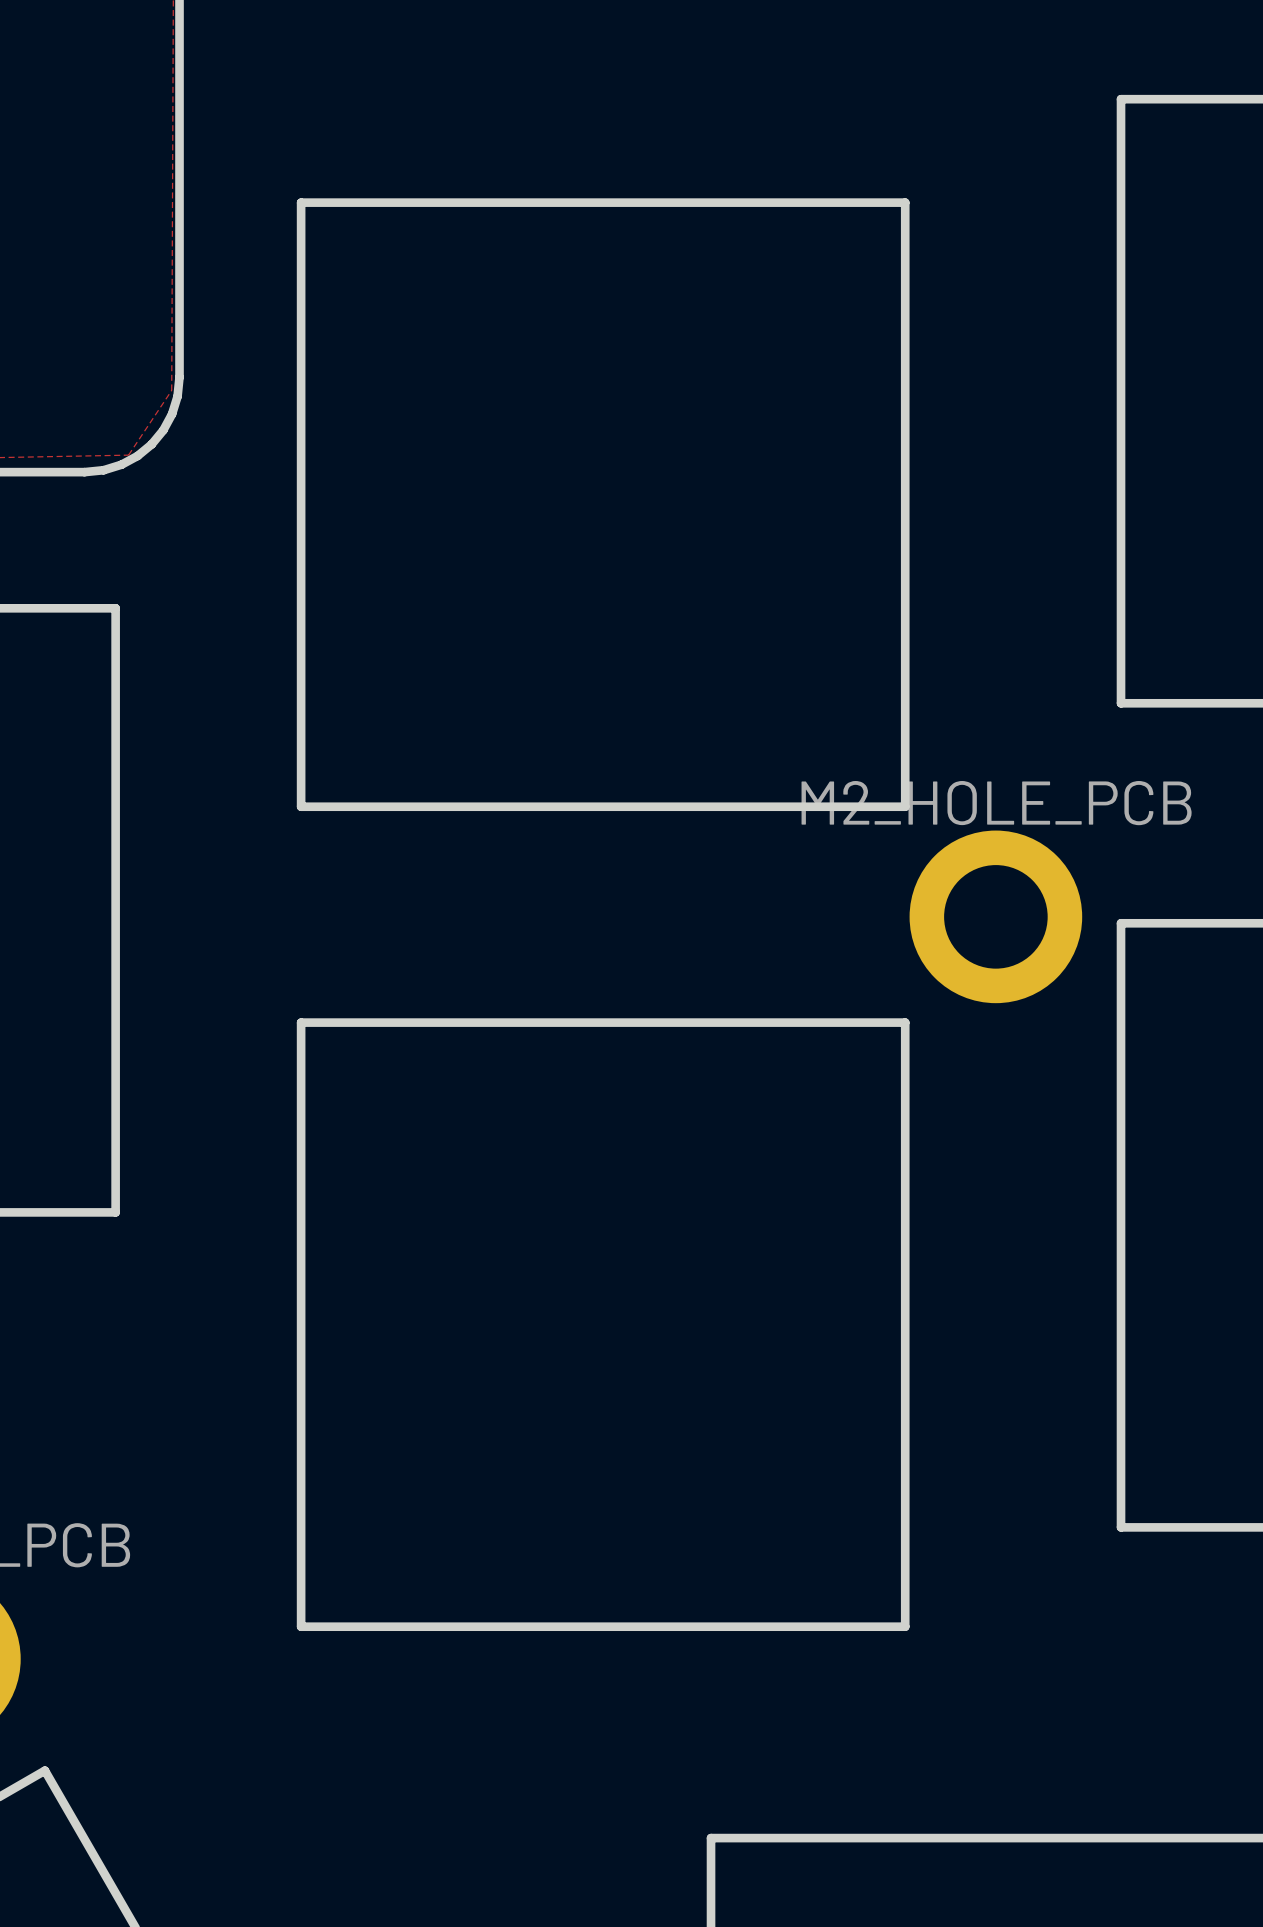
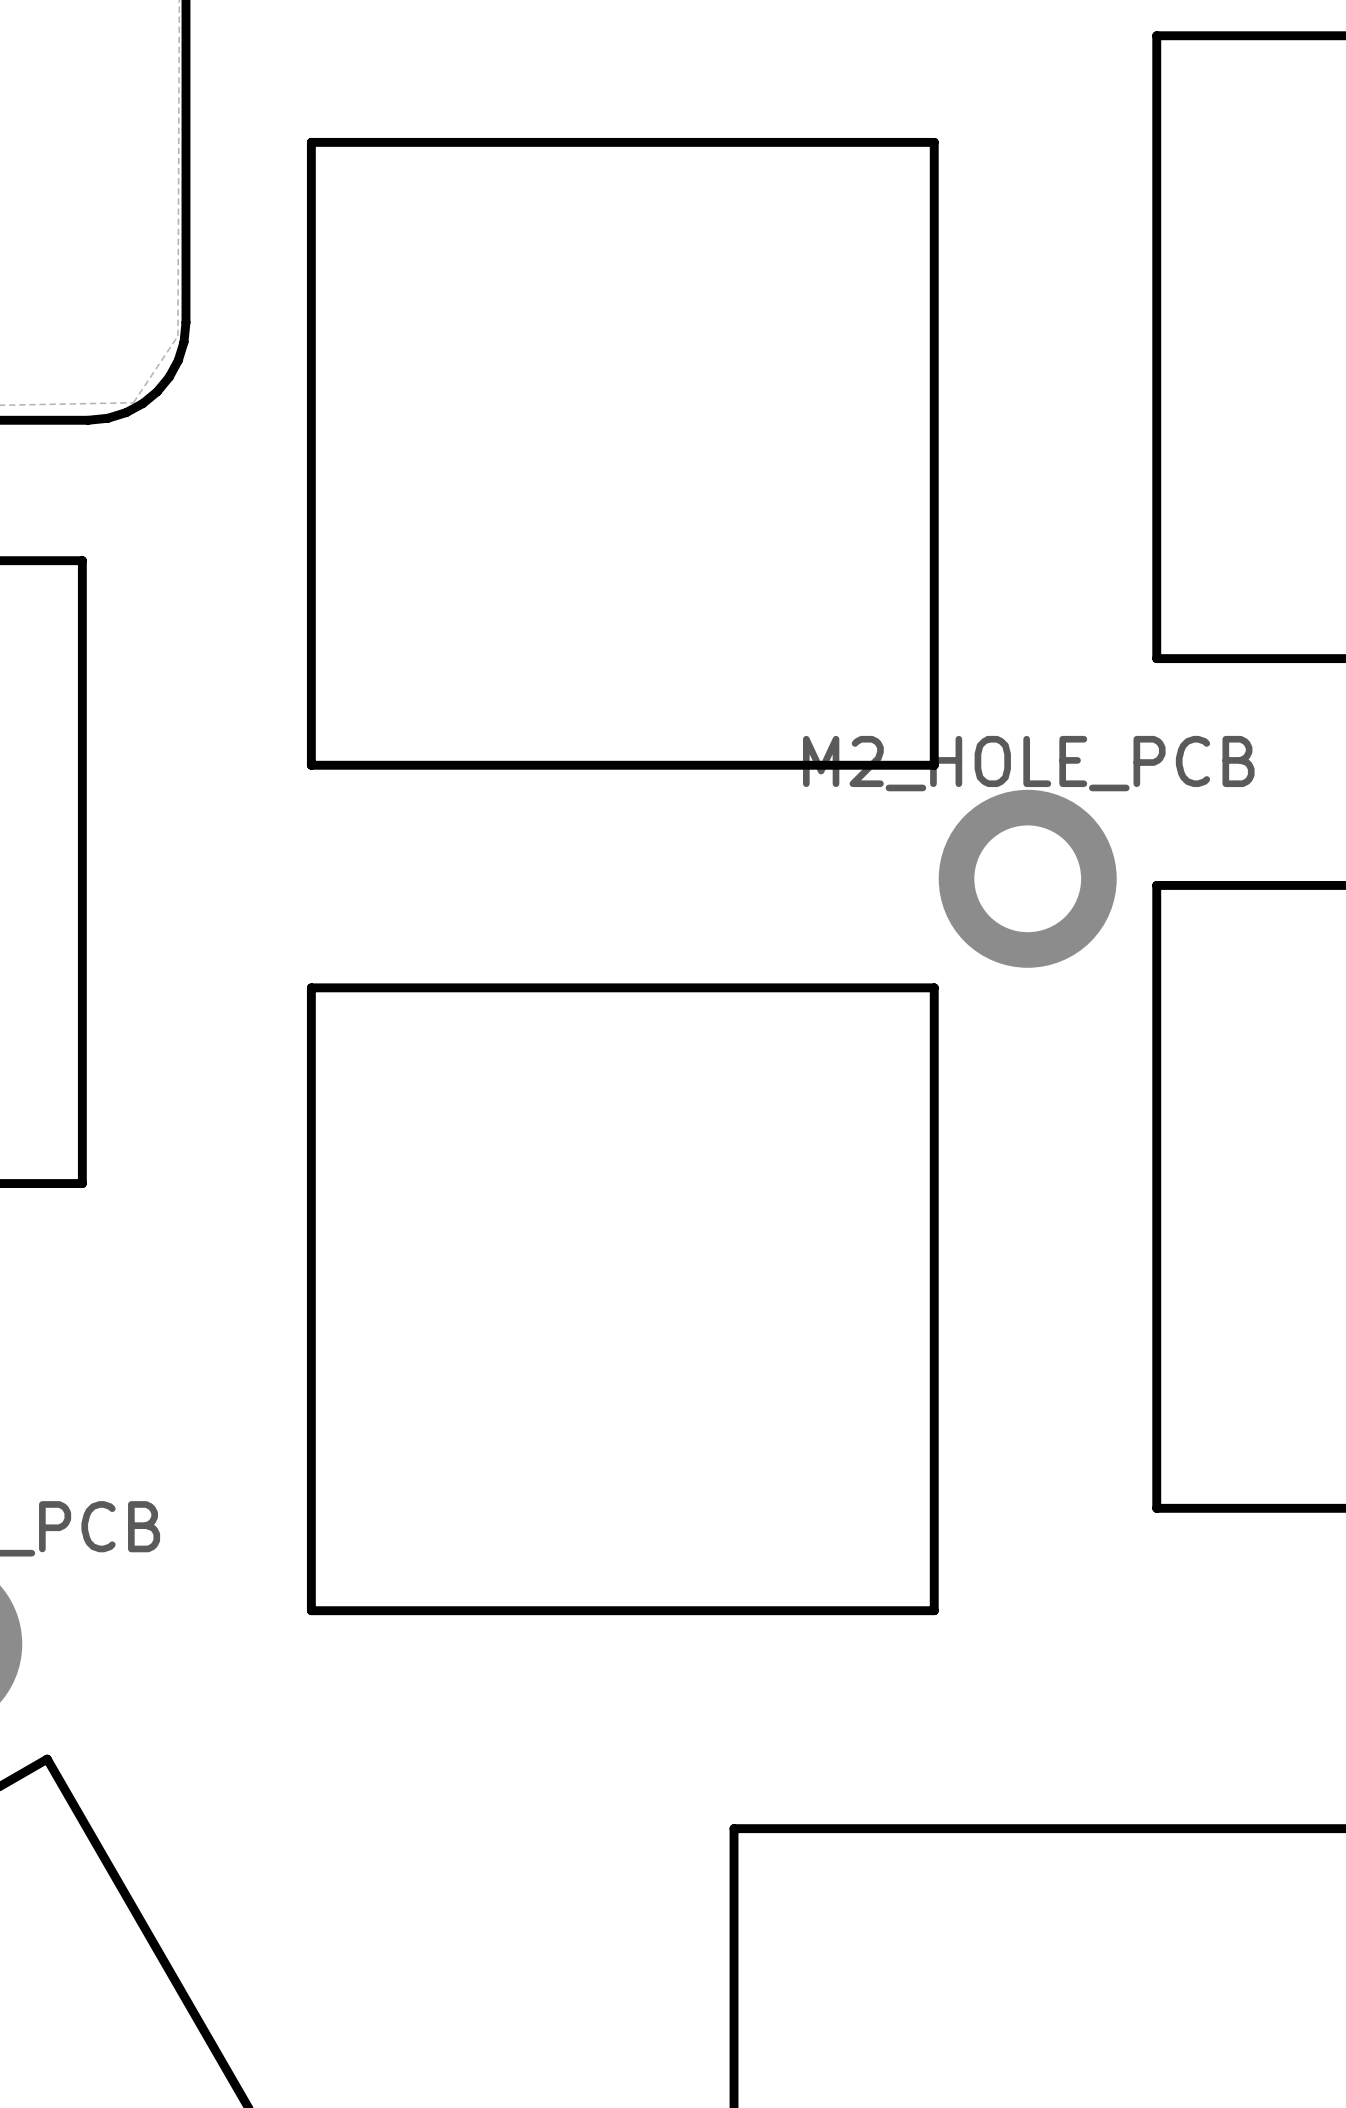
board edge: (79, 608) (115, 608) (115, 1212) (79, 1212) -> (82, 560) (82, 1183)

